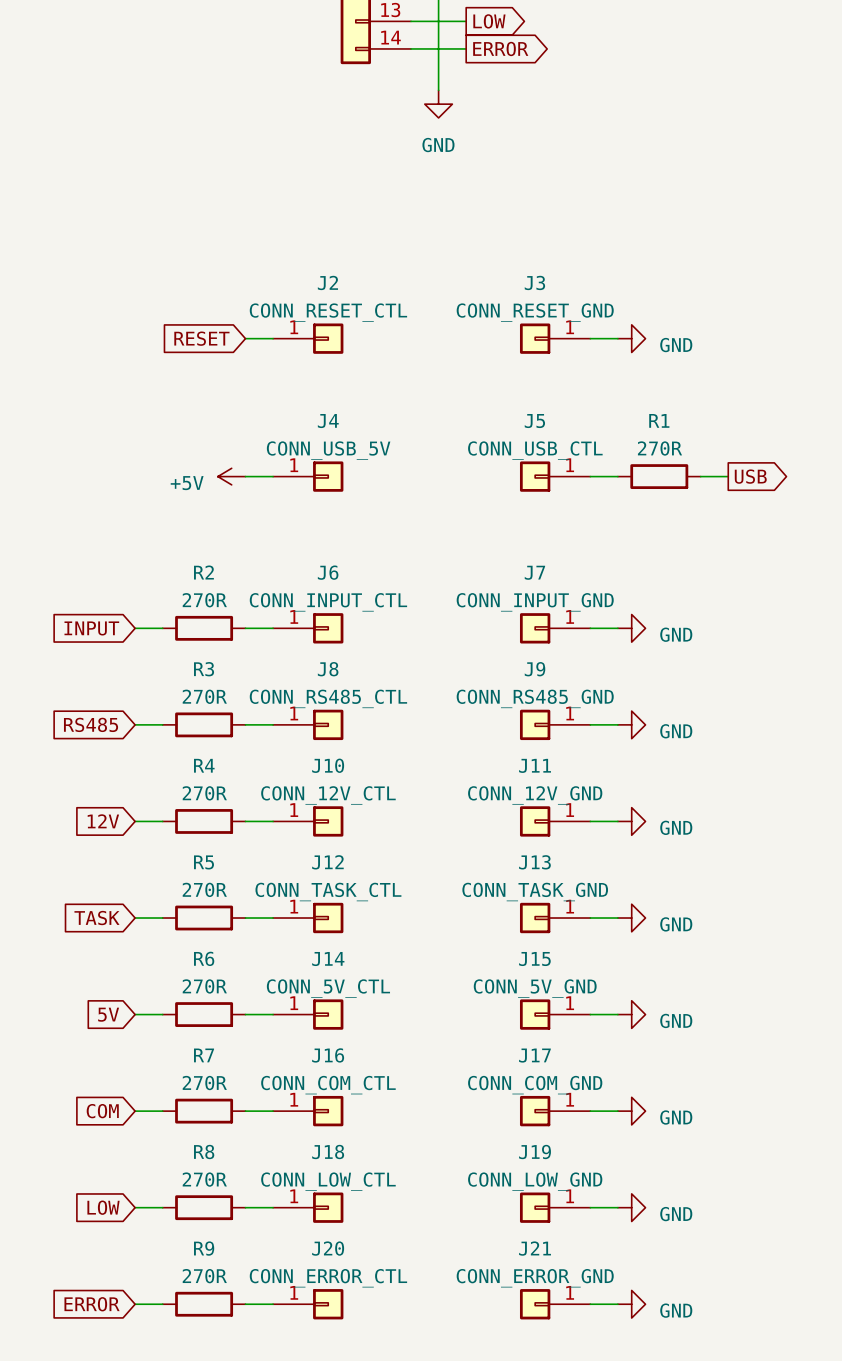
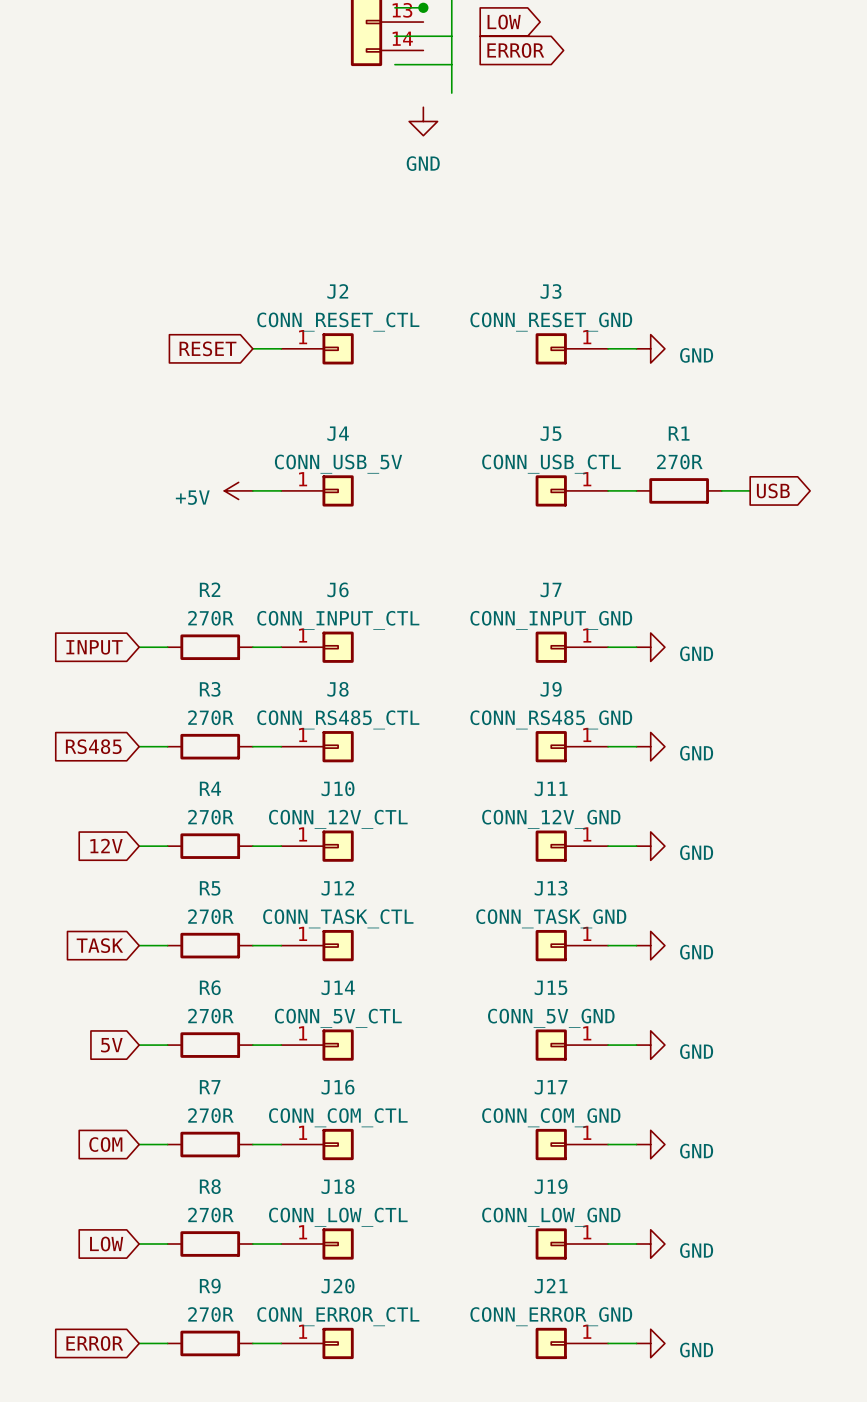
wire: none -> (394, 7) (423, 7)
junction: none -> (423, 7)
wire: (411, 21) (466, 21) -> (394, 36) (451, 36)
wire: (411, 48) (466, 48) -> (394, 64) (451, 64)
power symbol position: GND (438, 104) -> GND (423, 121)

